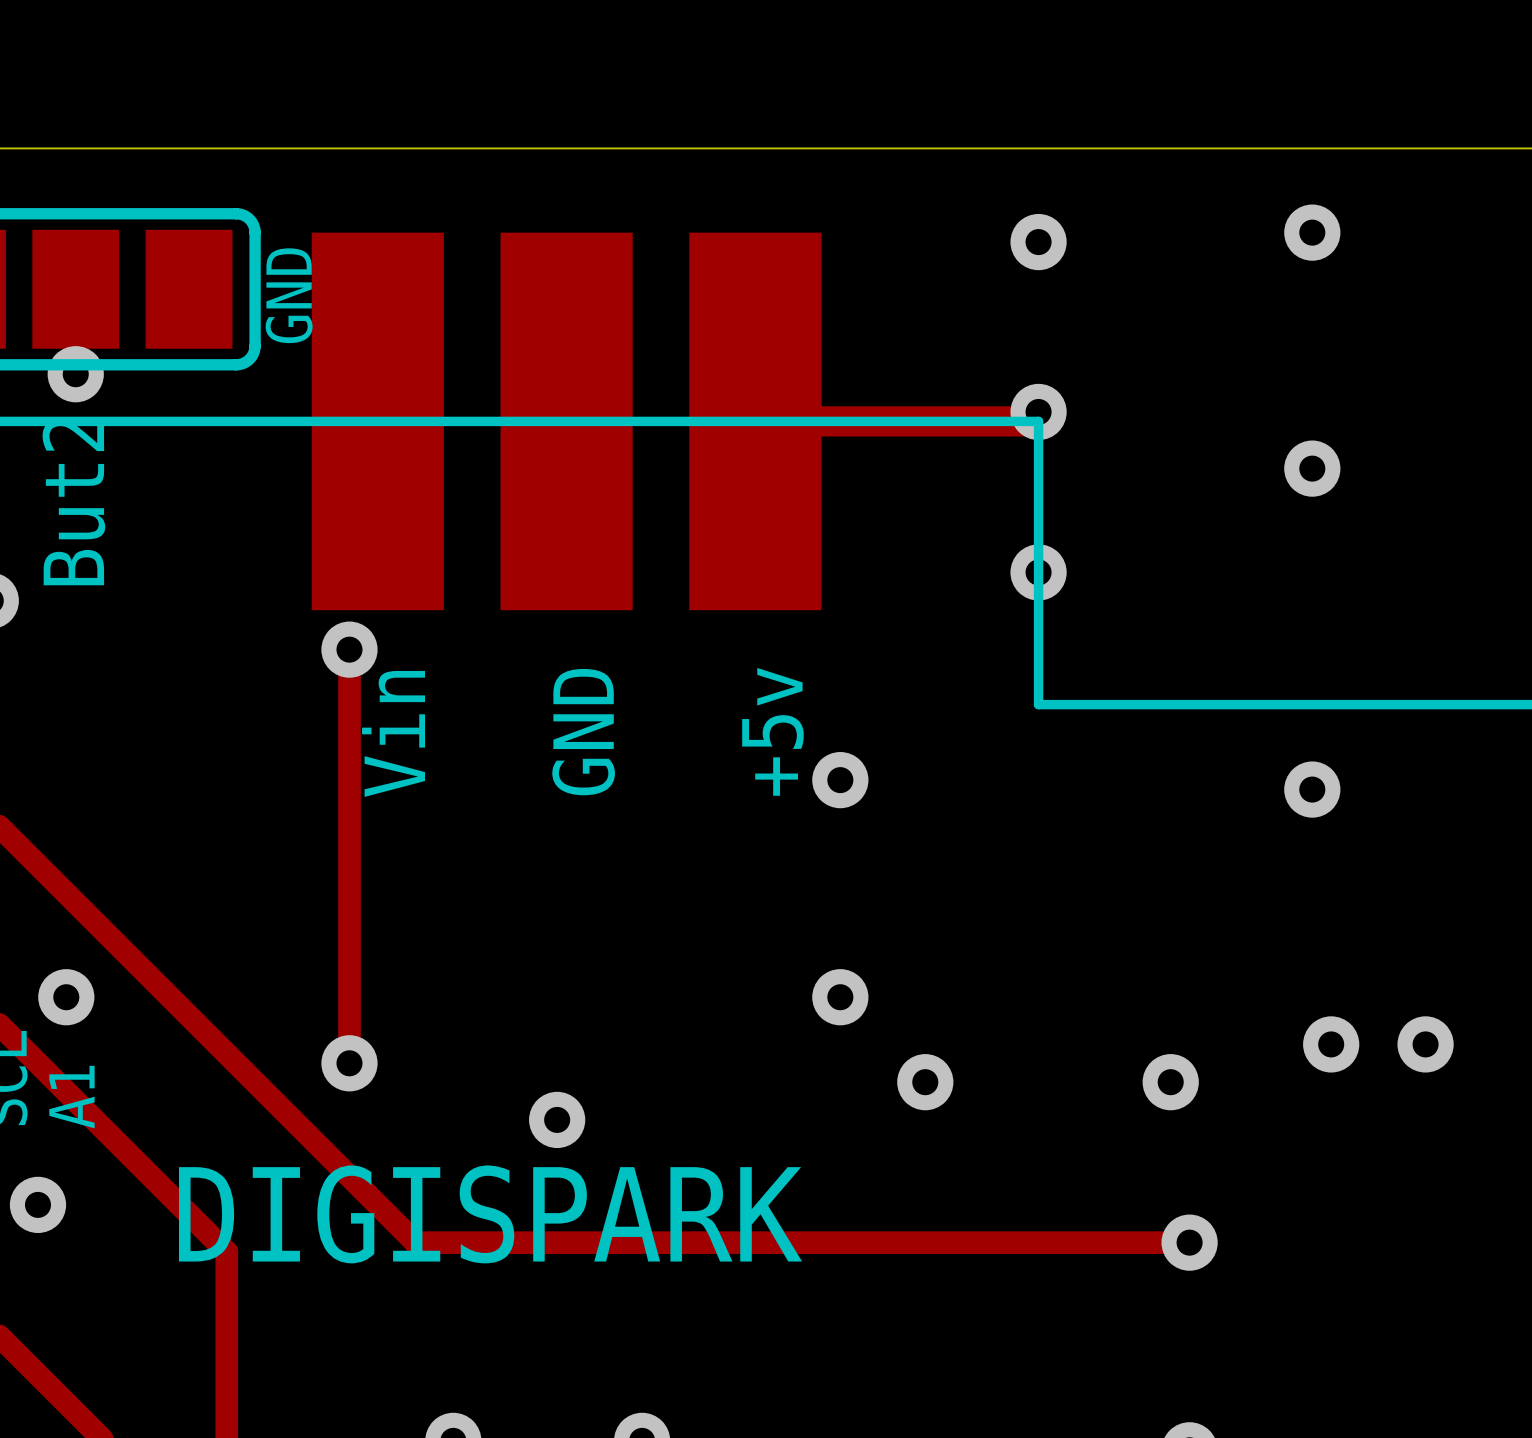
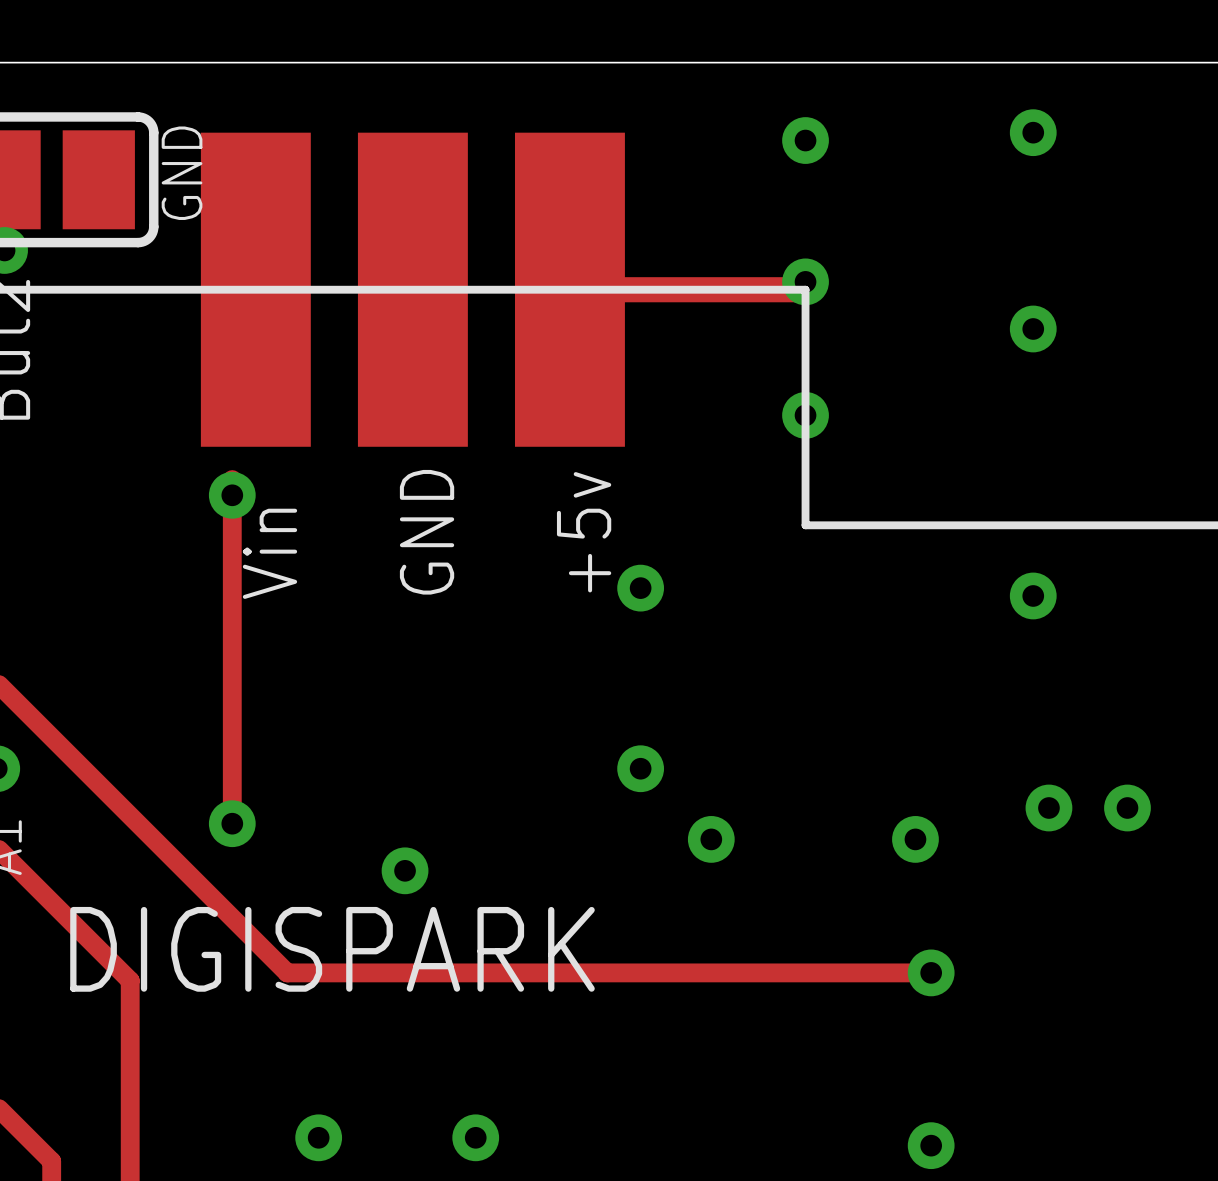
via position: (349, 649) -> (232, 495)

